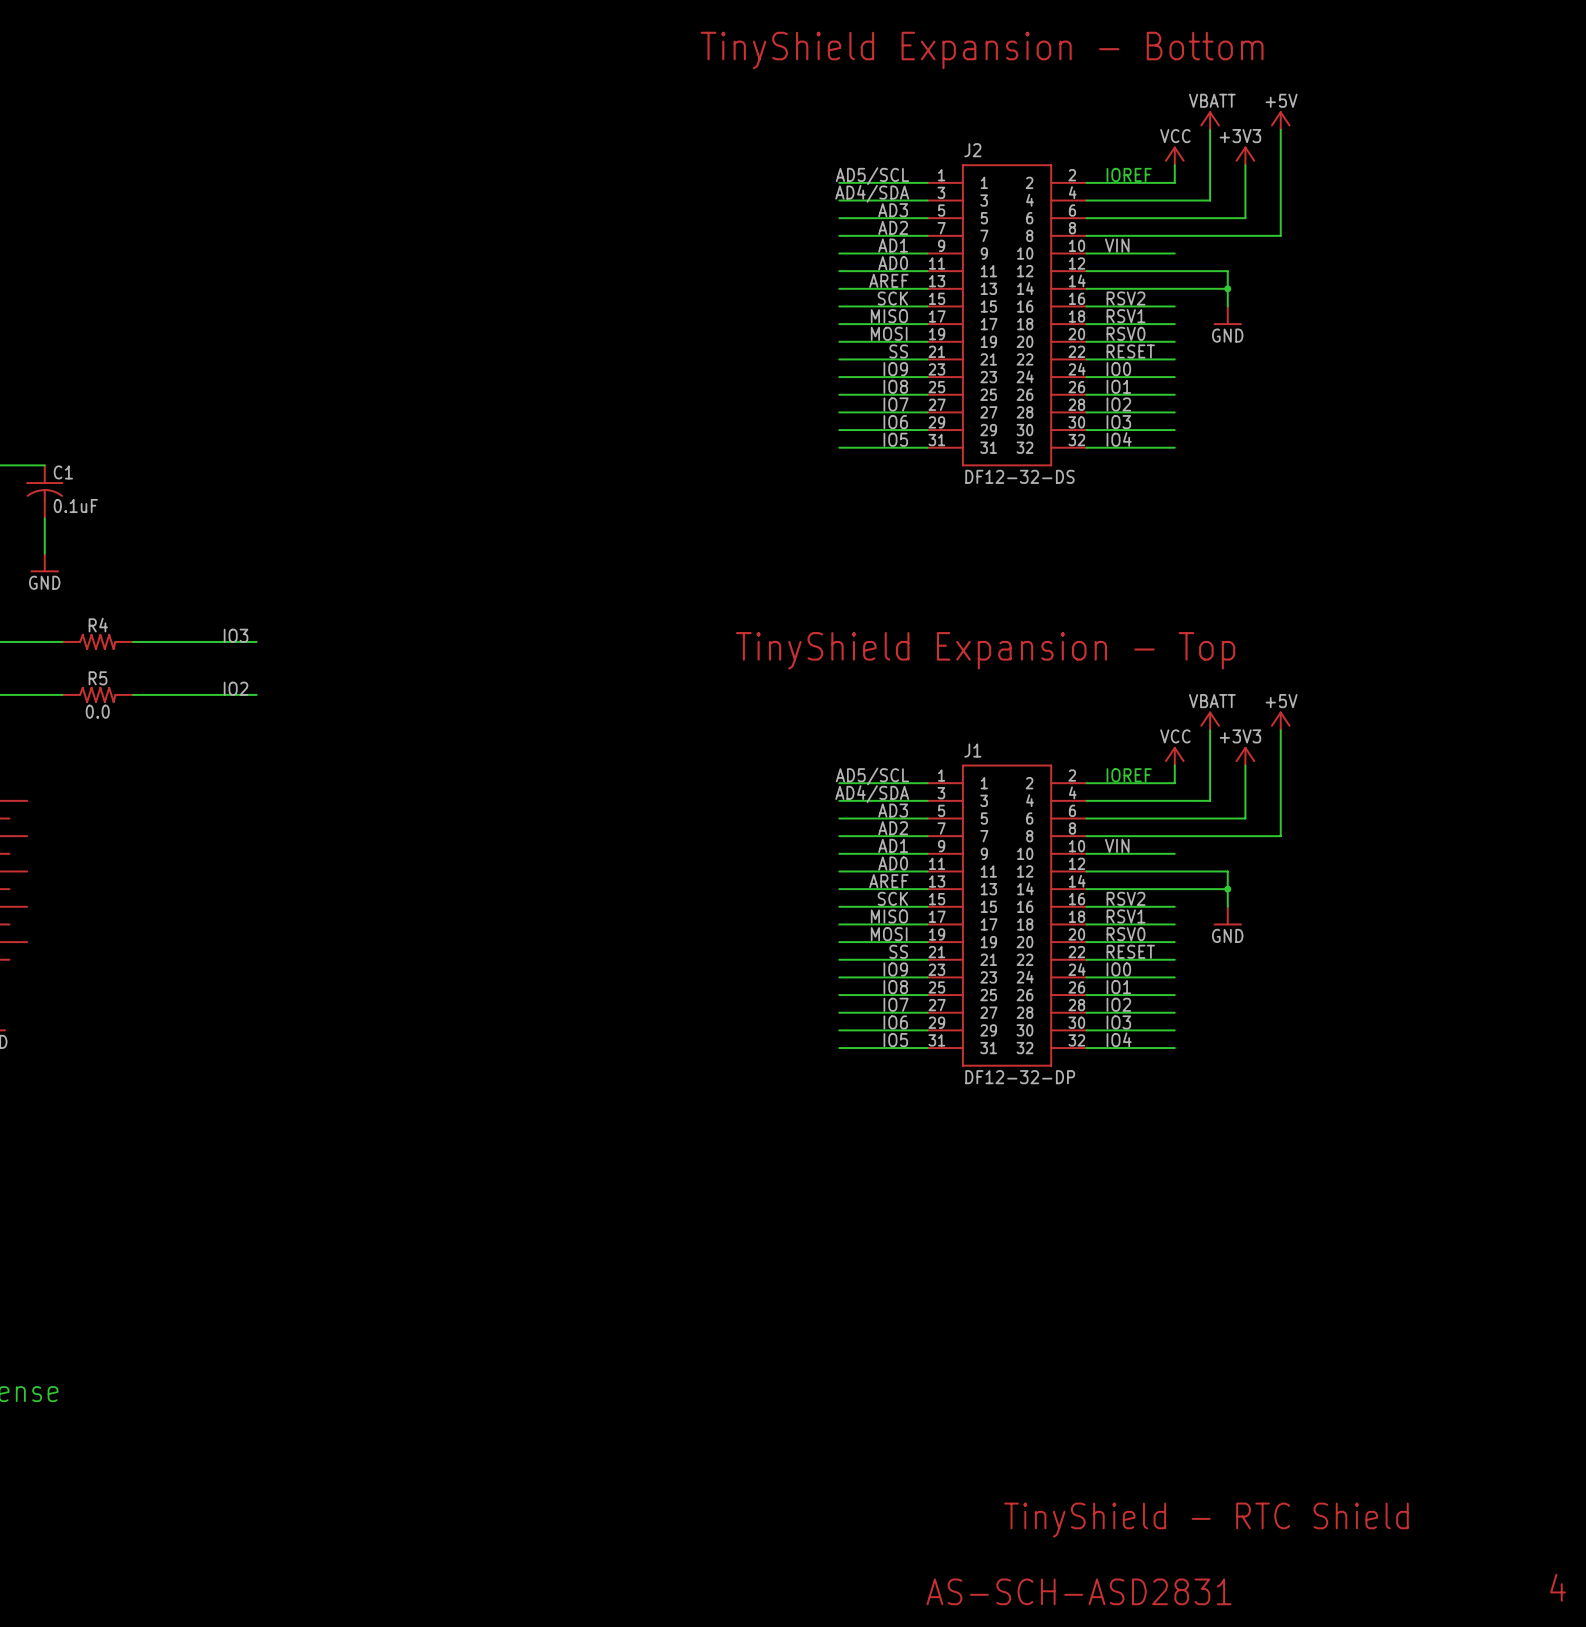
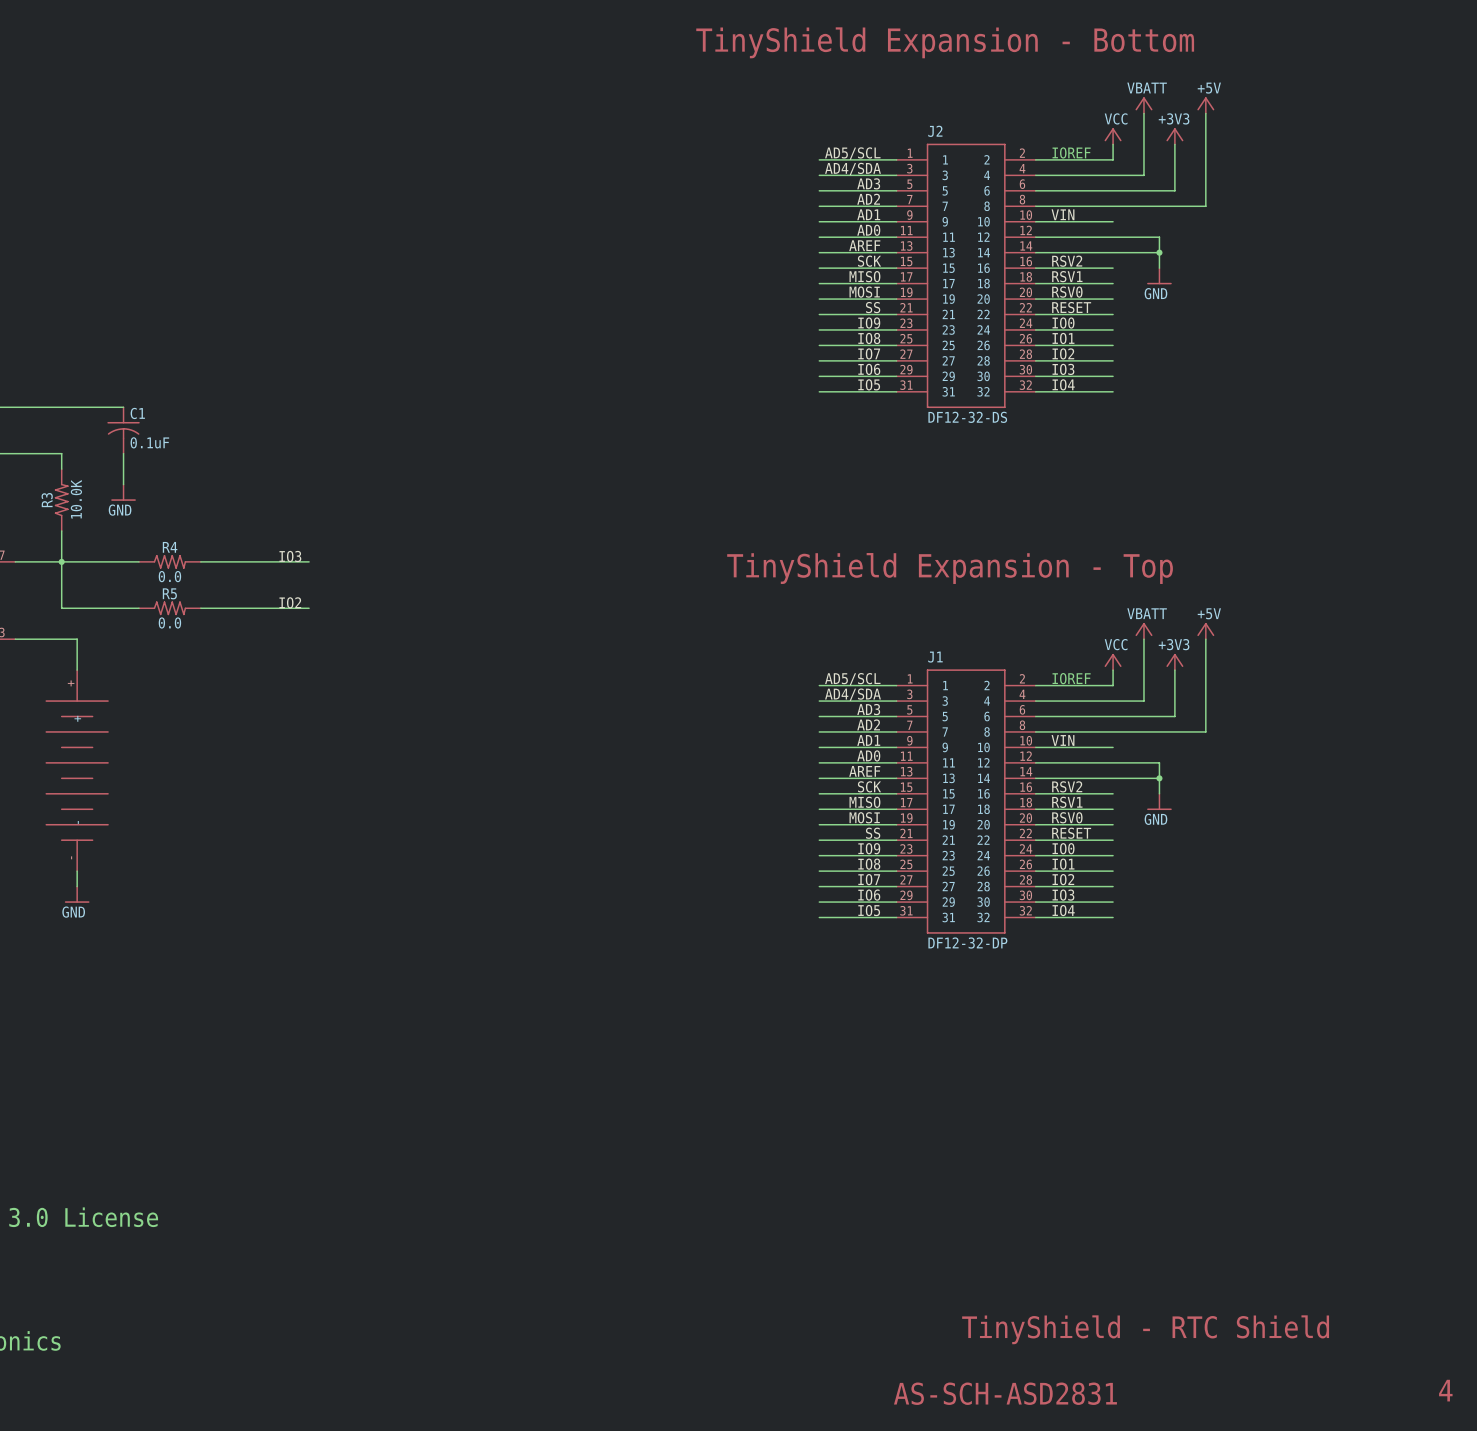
R4 value: none -> 0.0 (169, 576)

